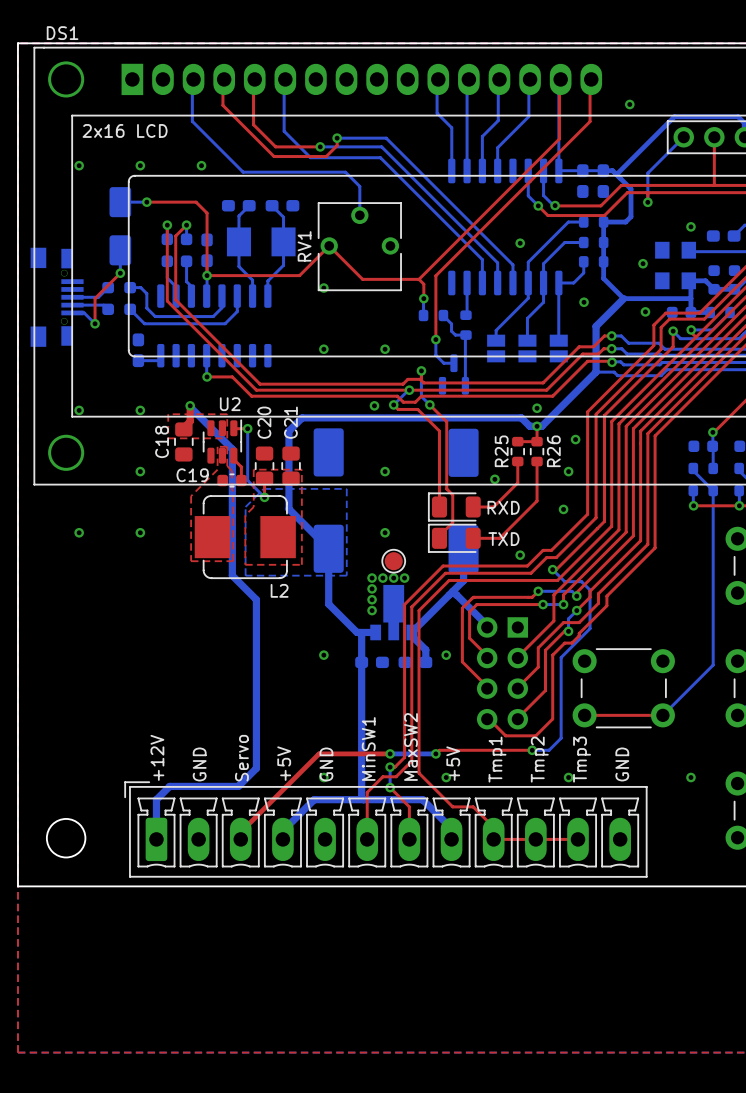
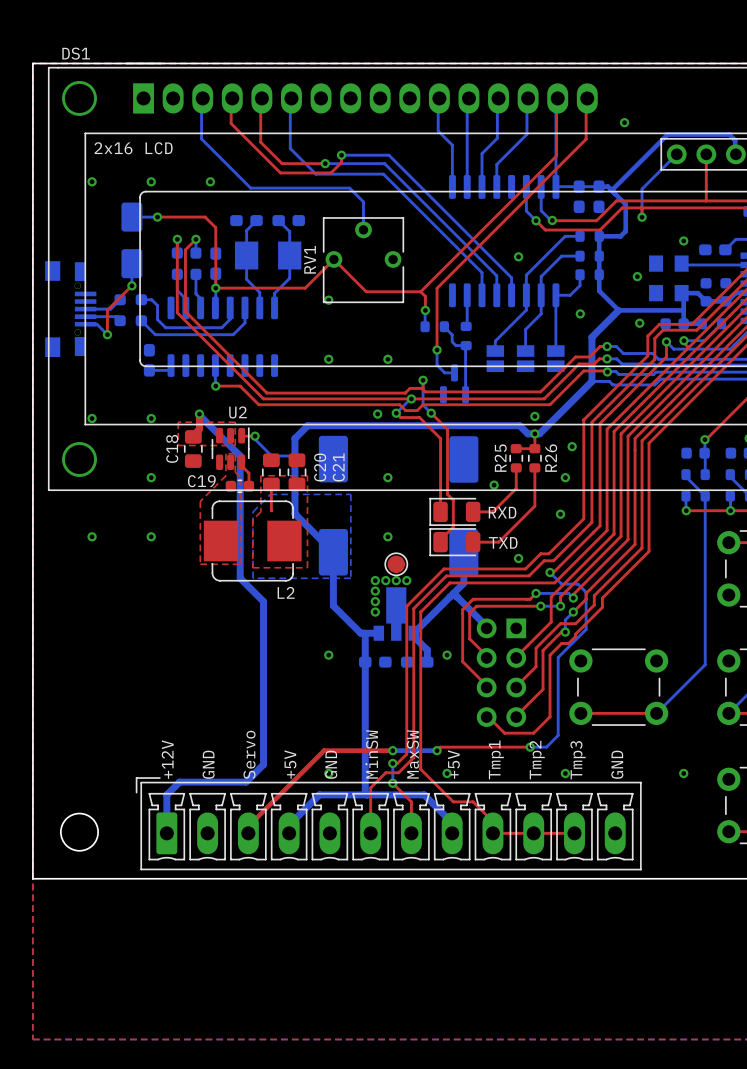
C20 name position: C20 (264, 422) -> C20 (320, 467)
C21 name position: C21 (290, 422) -> C21 (338, 467)
bottom track: (247, 432) (247, 480) (264, 497) -> (255, 439) (271, 455) (294, 454)
top track: none -> (271, 502) (271, 510)
via: (264, 497) -> none
text: MaxSW2 (410, 746) -> MaxSW (412, 754)
text: MinSW1 (368, 748) -> MinSW (371, 754)

